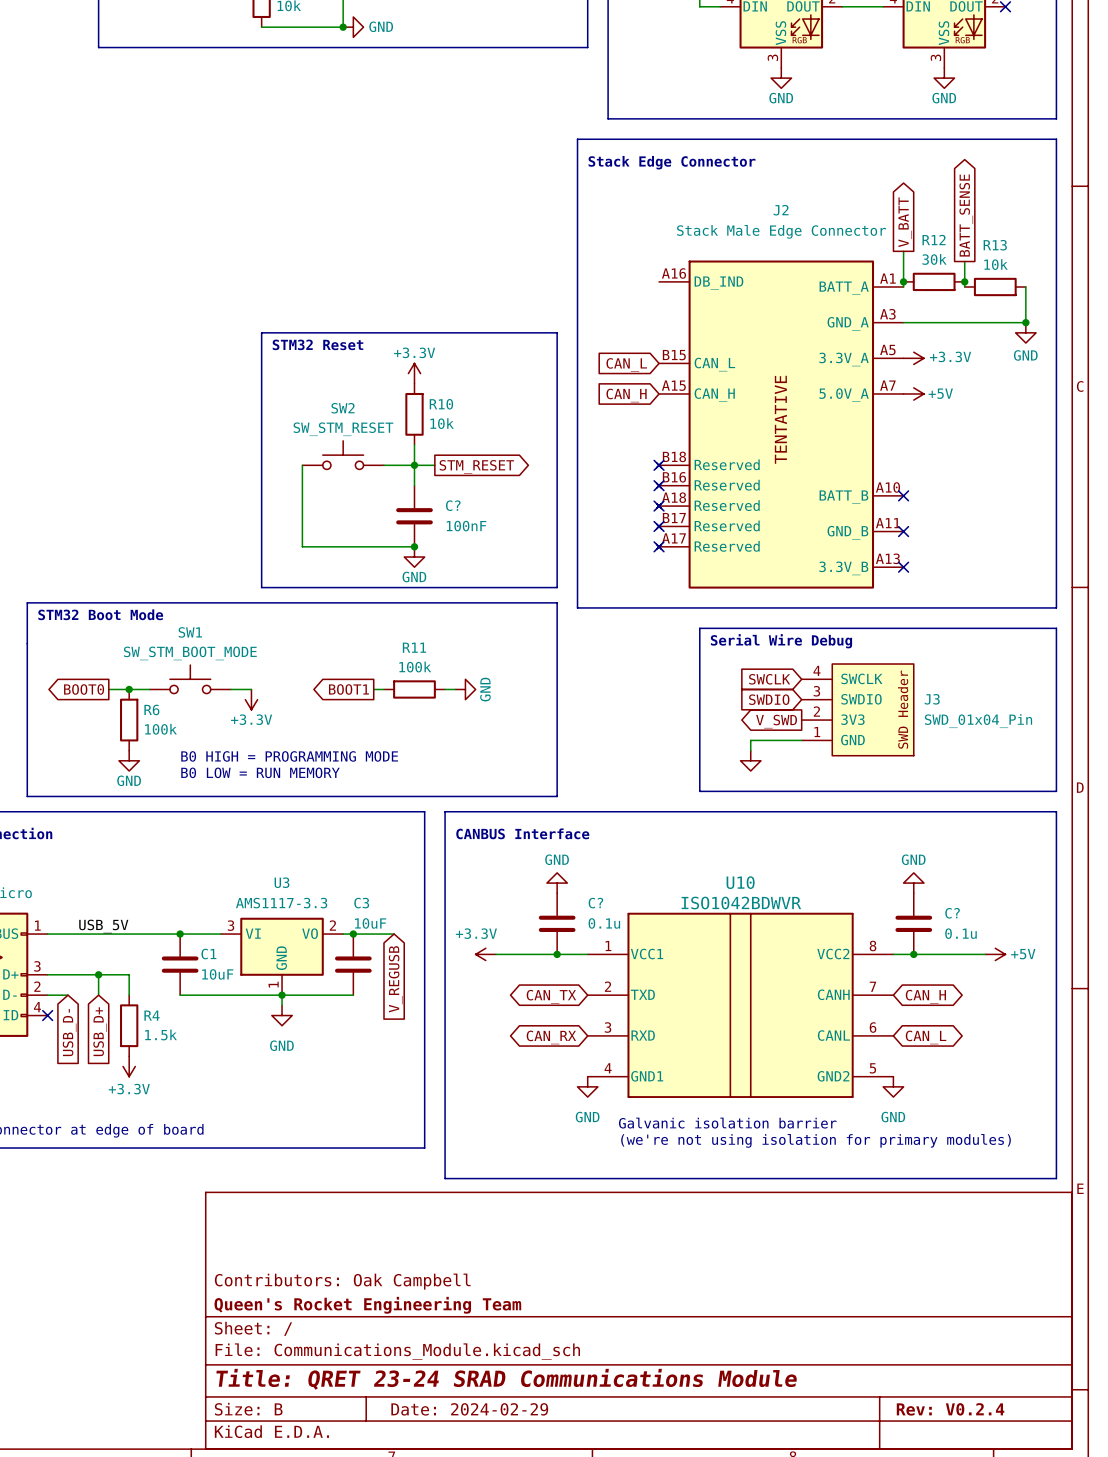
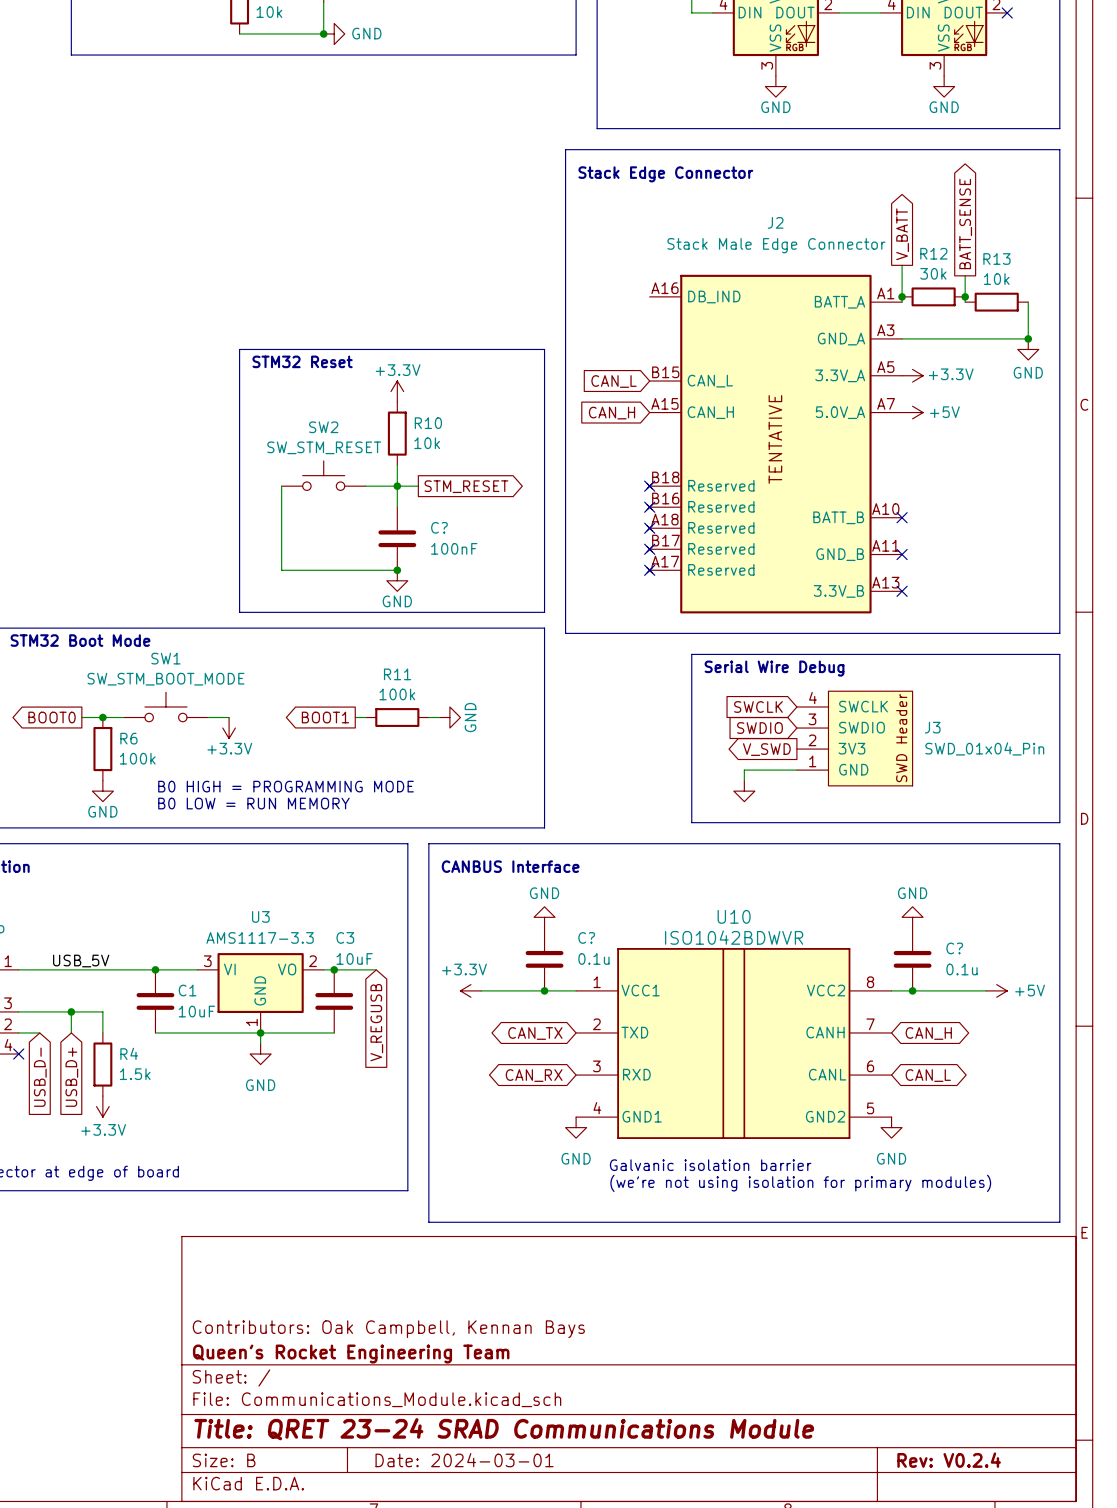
title block: Contributors: Oak Campbell (342, 1281) -> Contributors: Oak Campbell, Kennan Bays (388, 1329)
title block: Date: 2024-02-29 (469, 1409) -> Date: 2024-03-01 (464, 1460)

